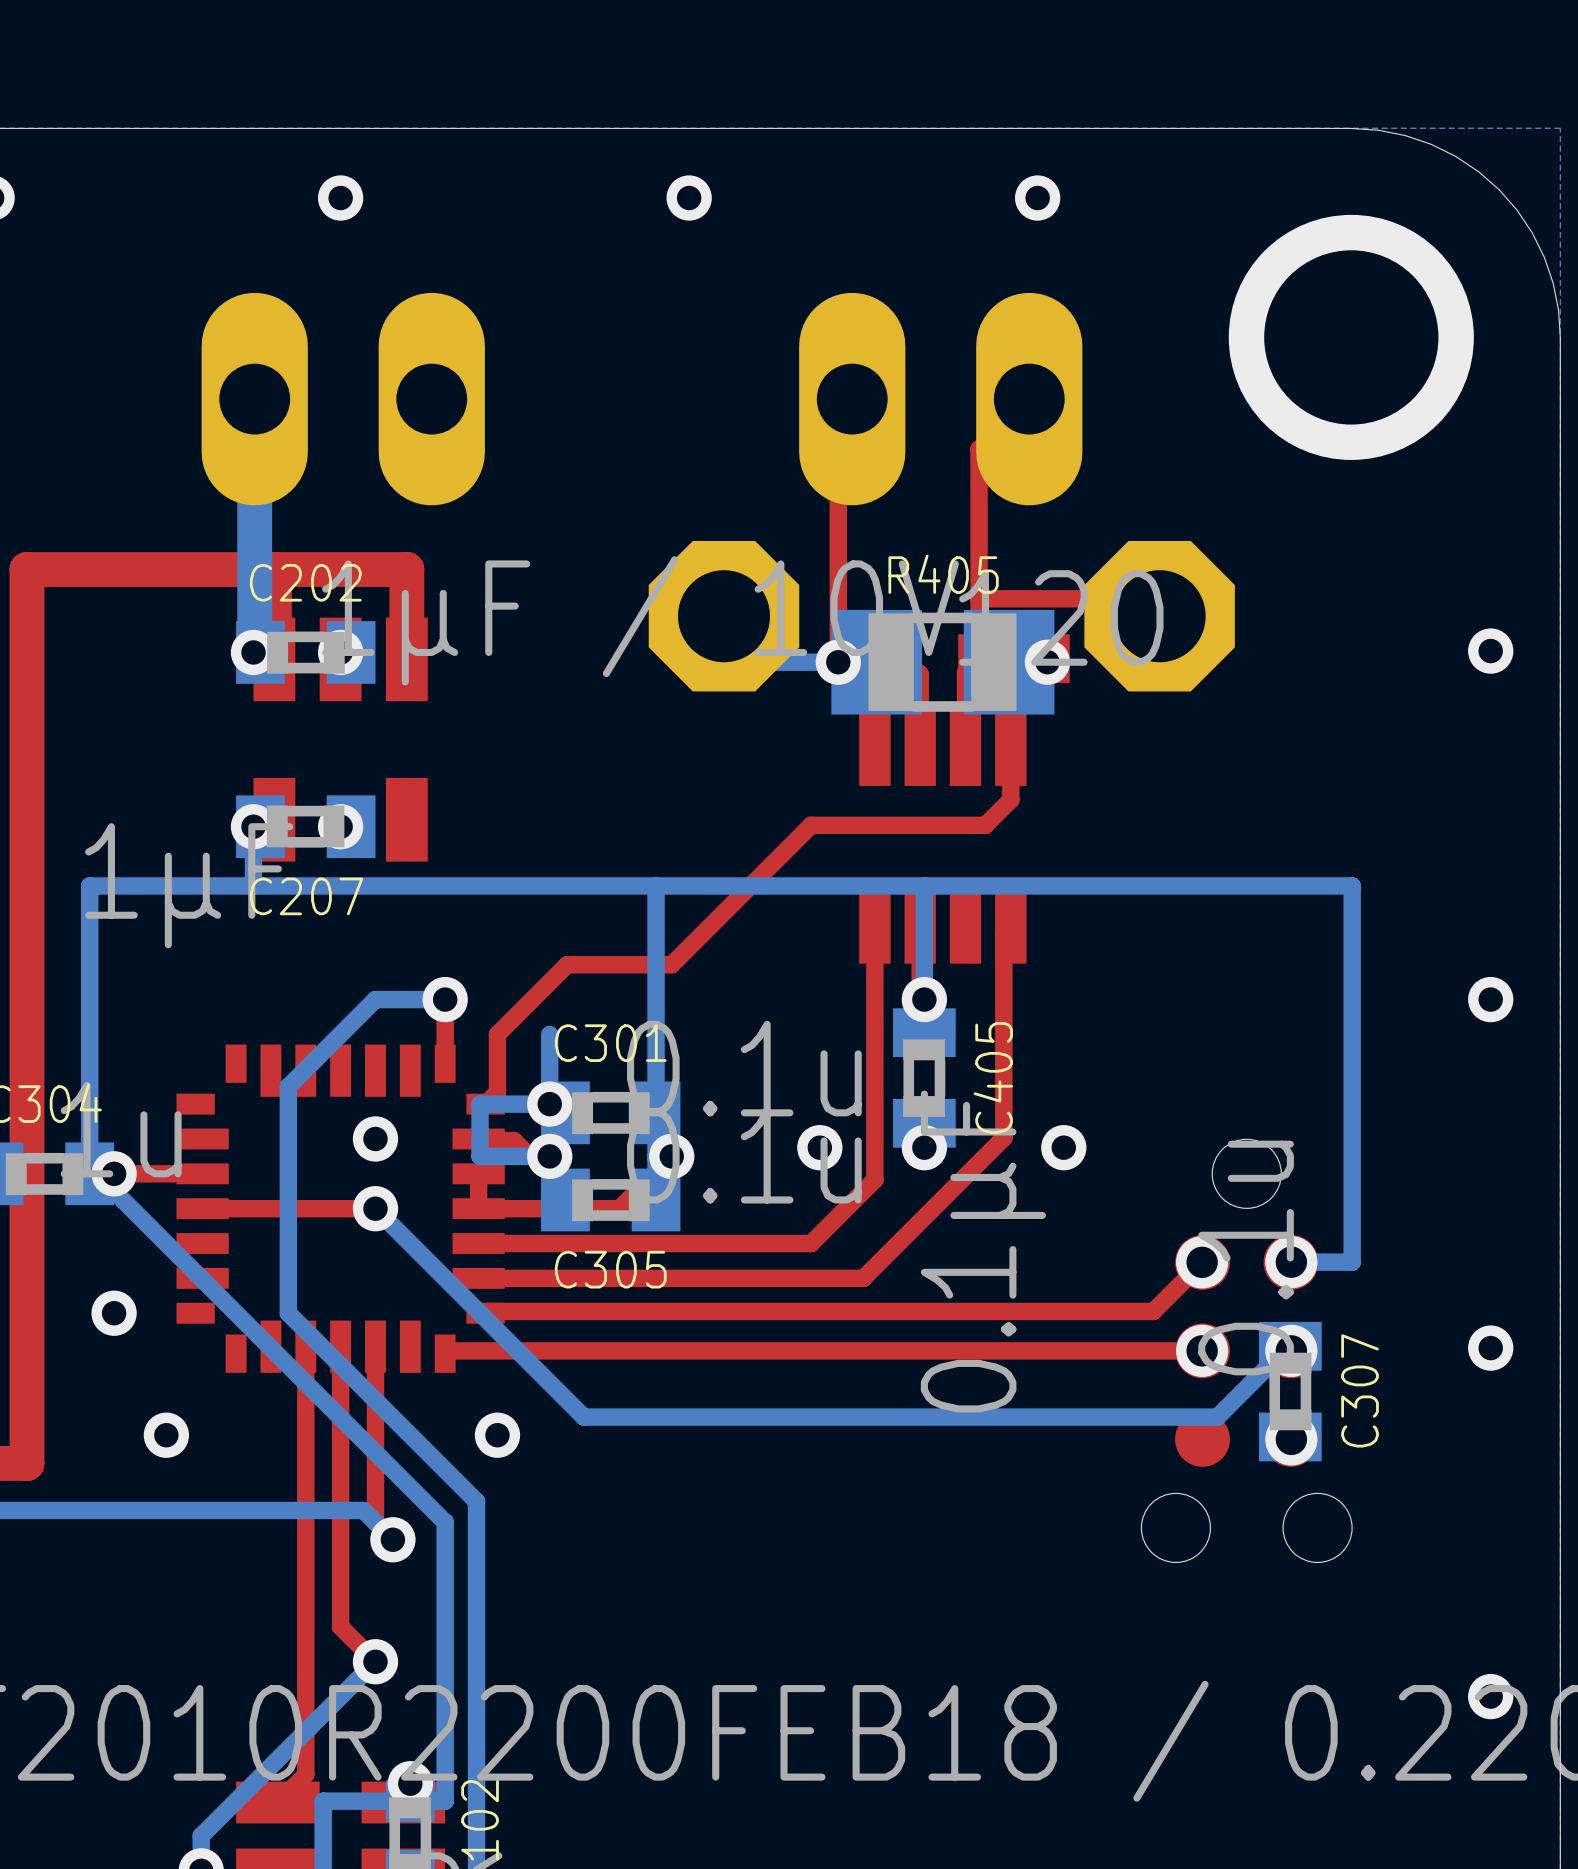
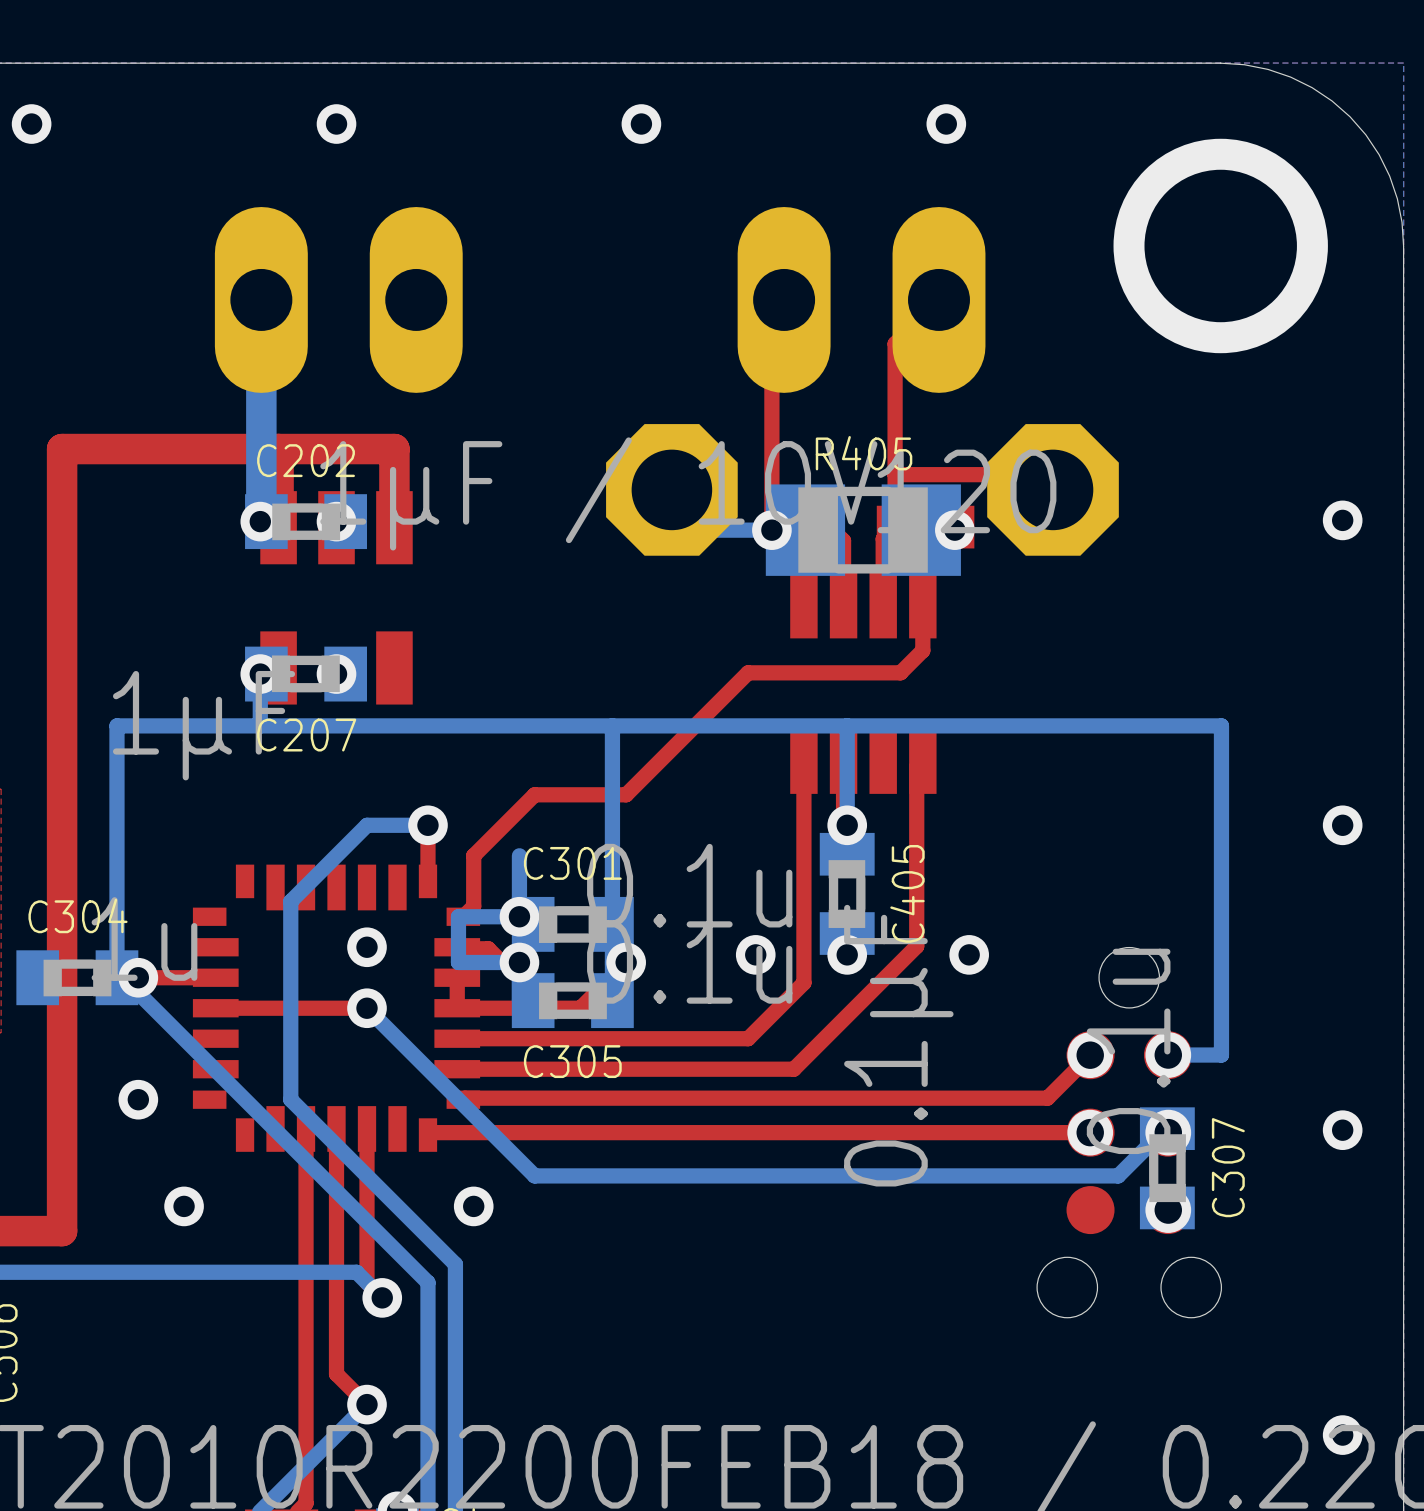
bottom track: (1234, 1400) (1217, 1417) (583, 1417) (567, 1400) -> (1118, 1175) (534, 1175)

